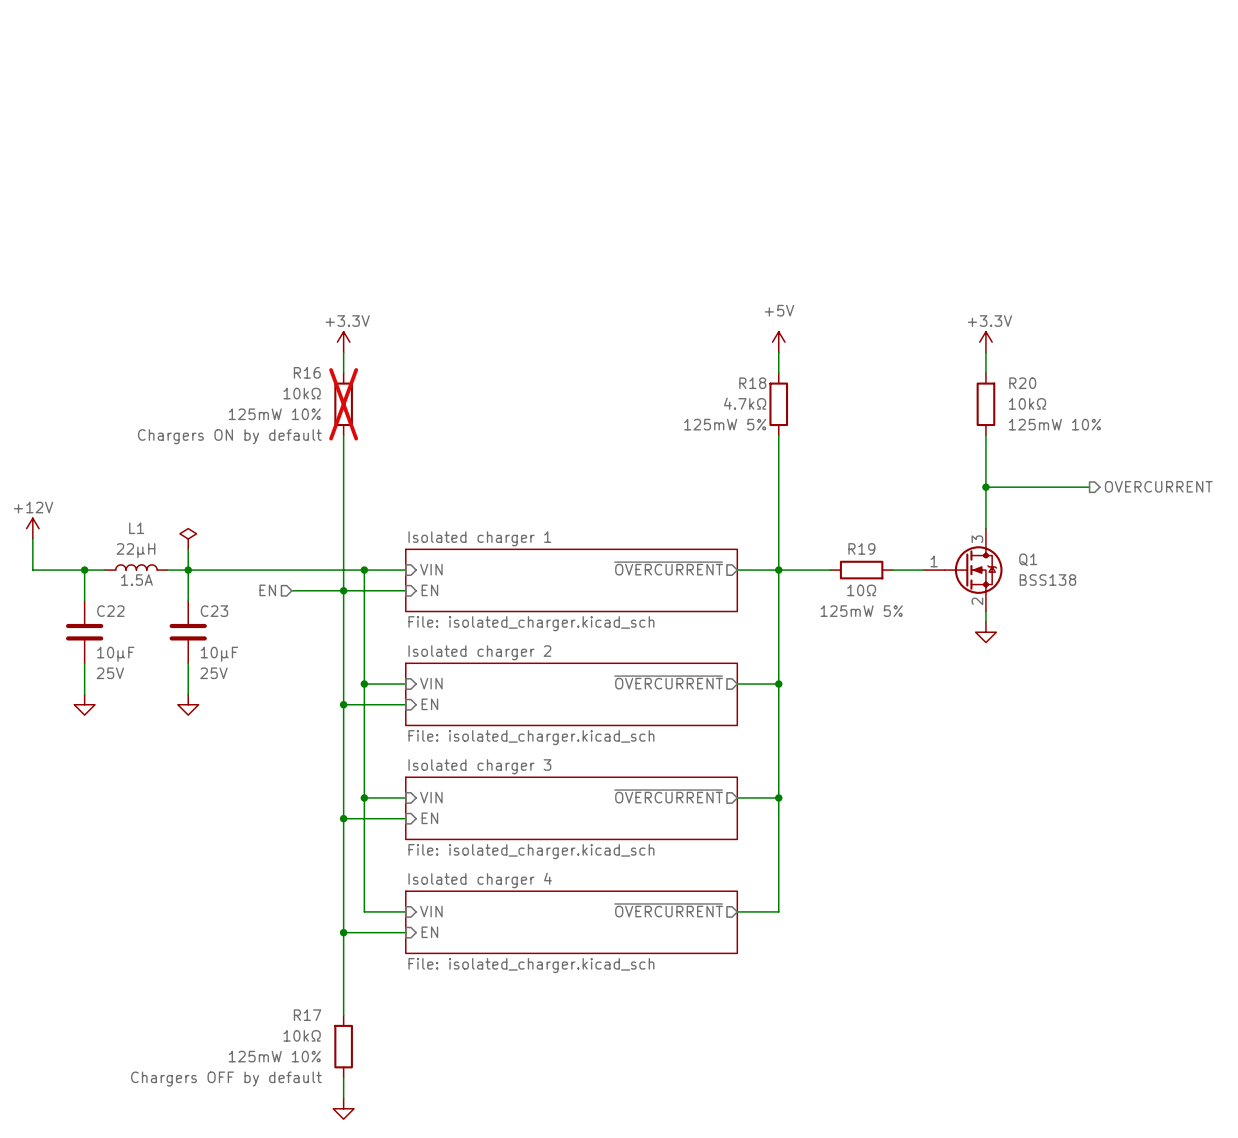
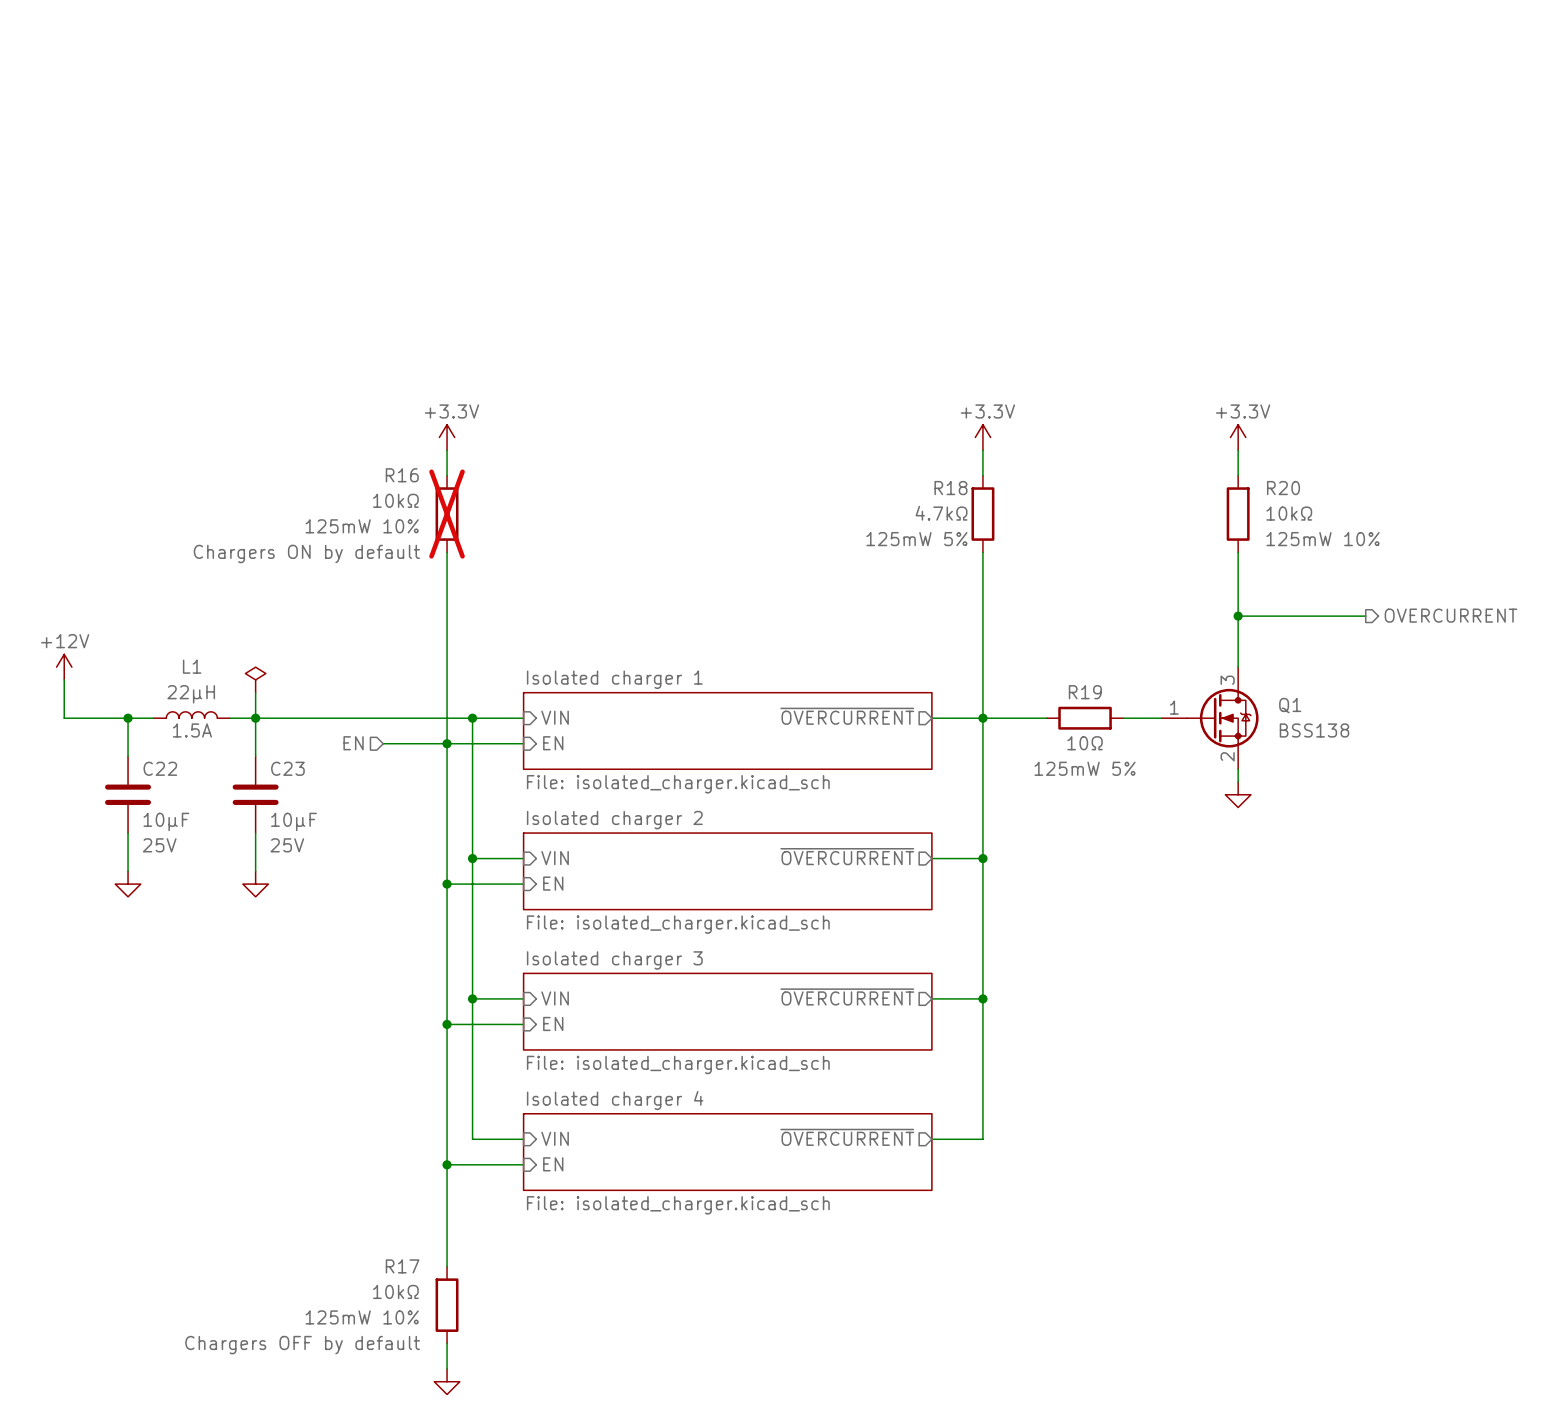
power symbol: +5V (778, 342) -> +3.3V (982, 437)

